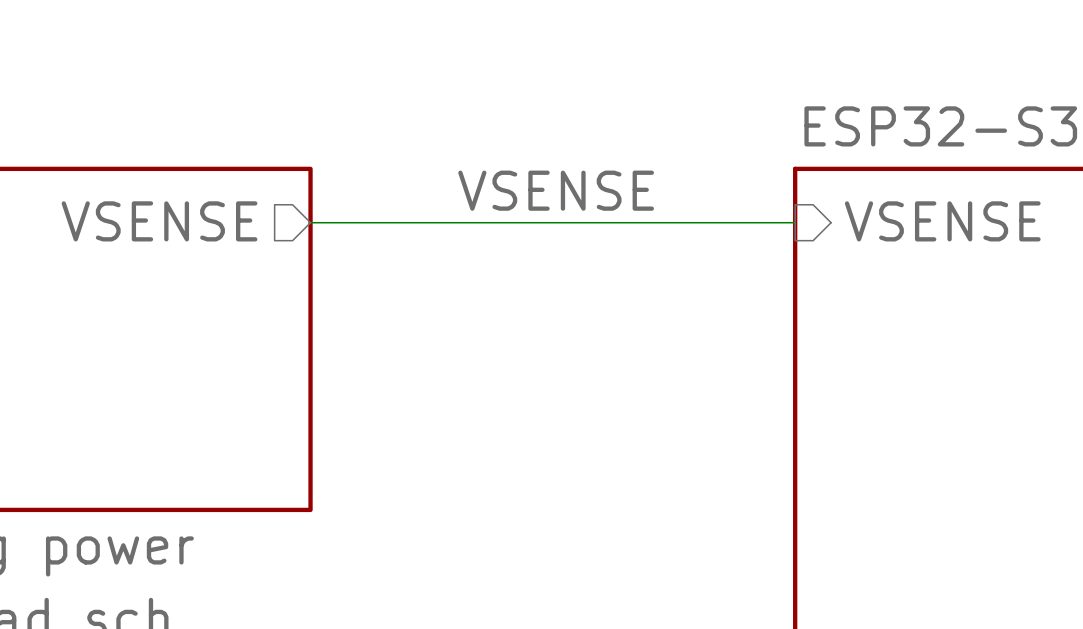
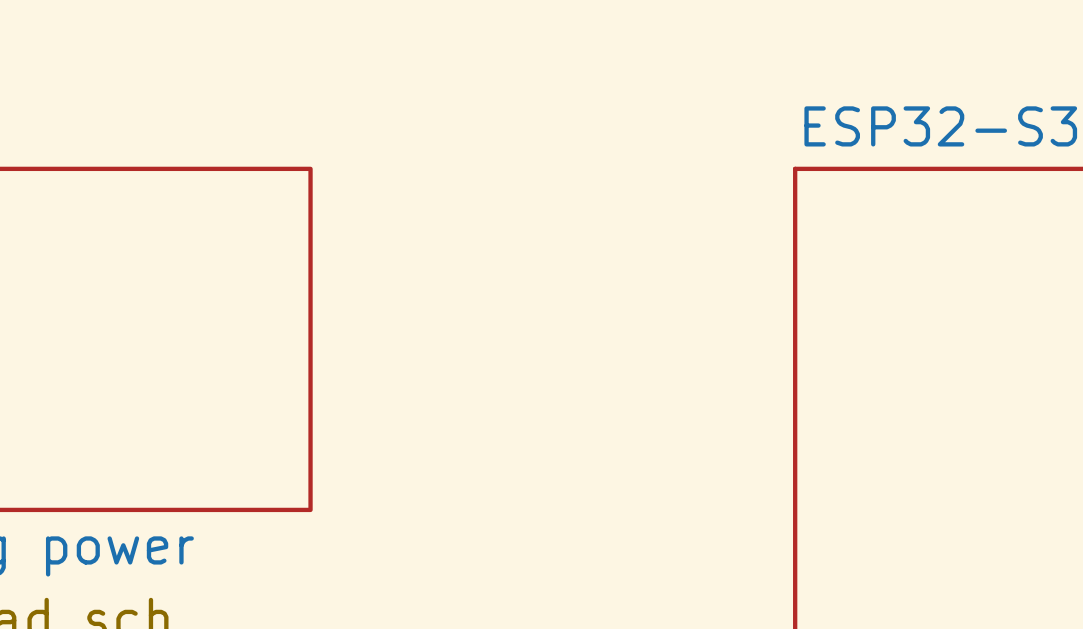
label: VSENSE (556, 190) -> none
sheet pin: VSENSE (159, 221) -> none
sheet pin: VSENSE (942, 221) -> none
wire: (310, 222) (795, 222) -> none

